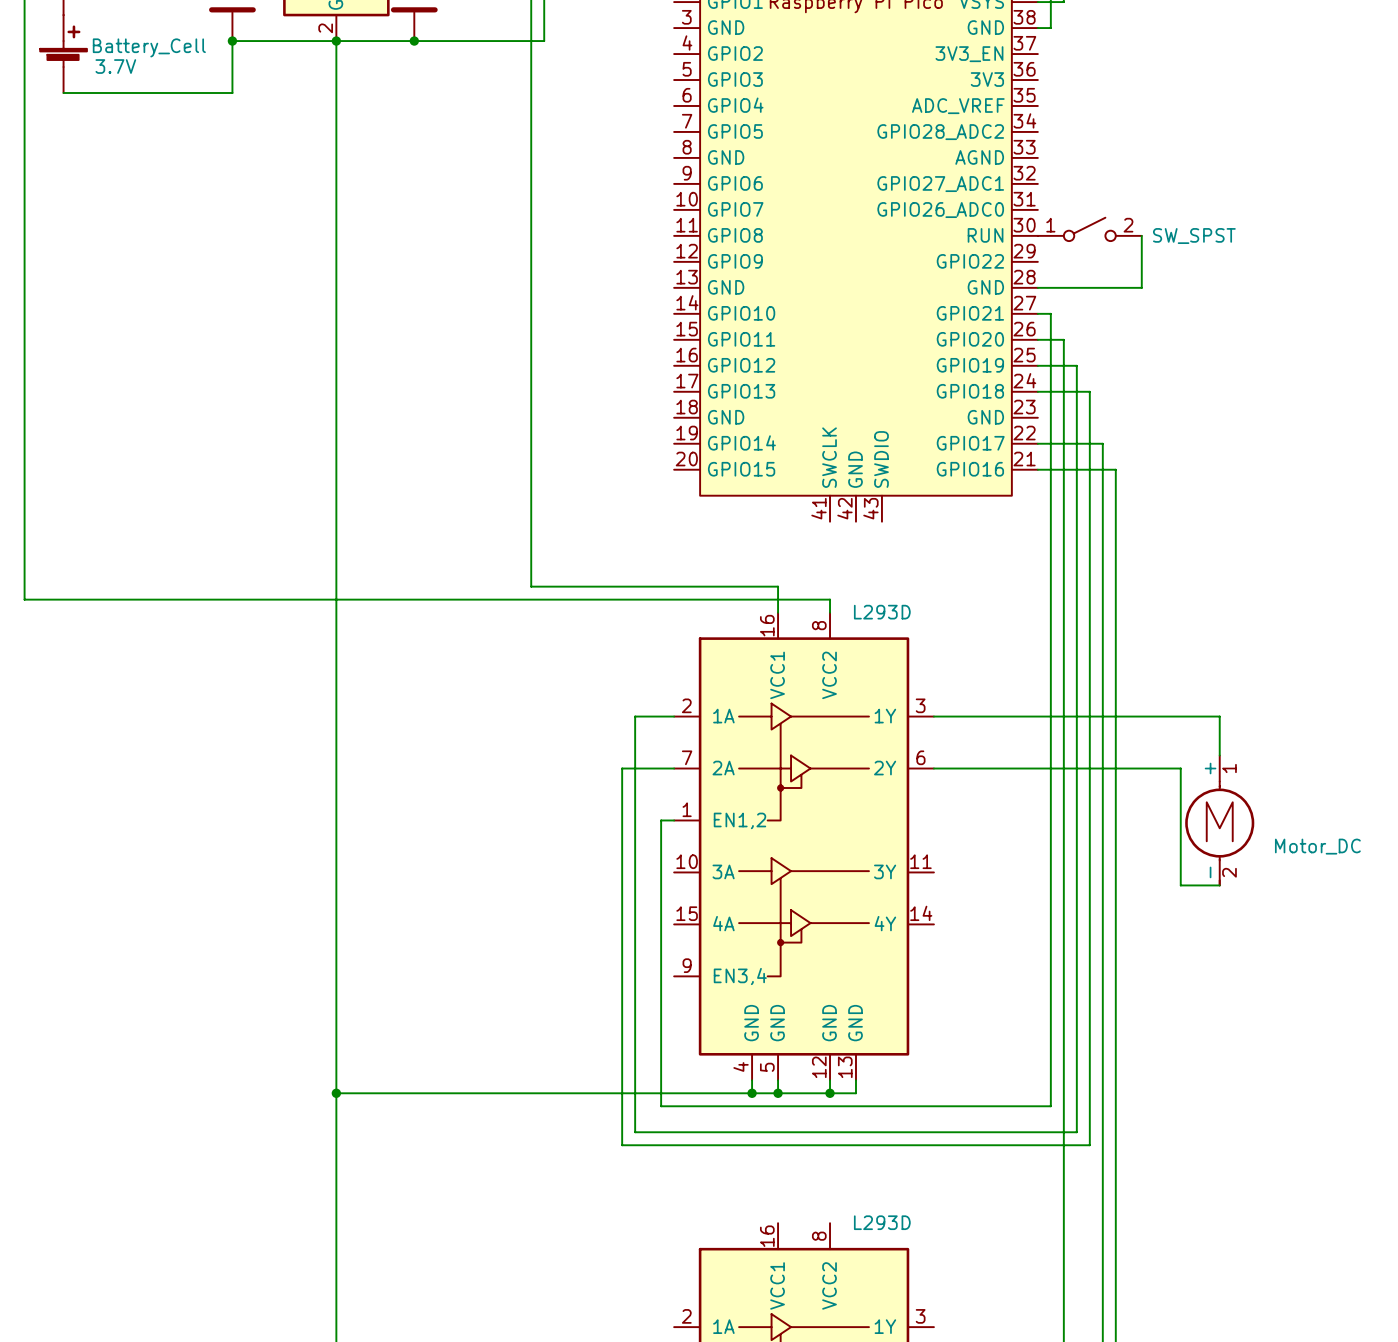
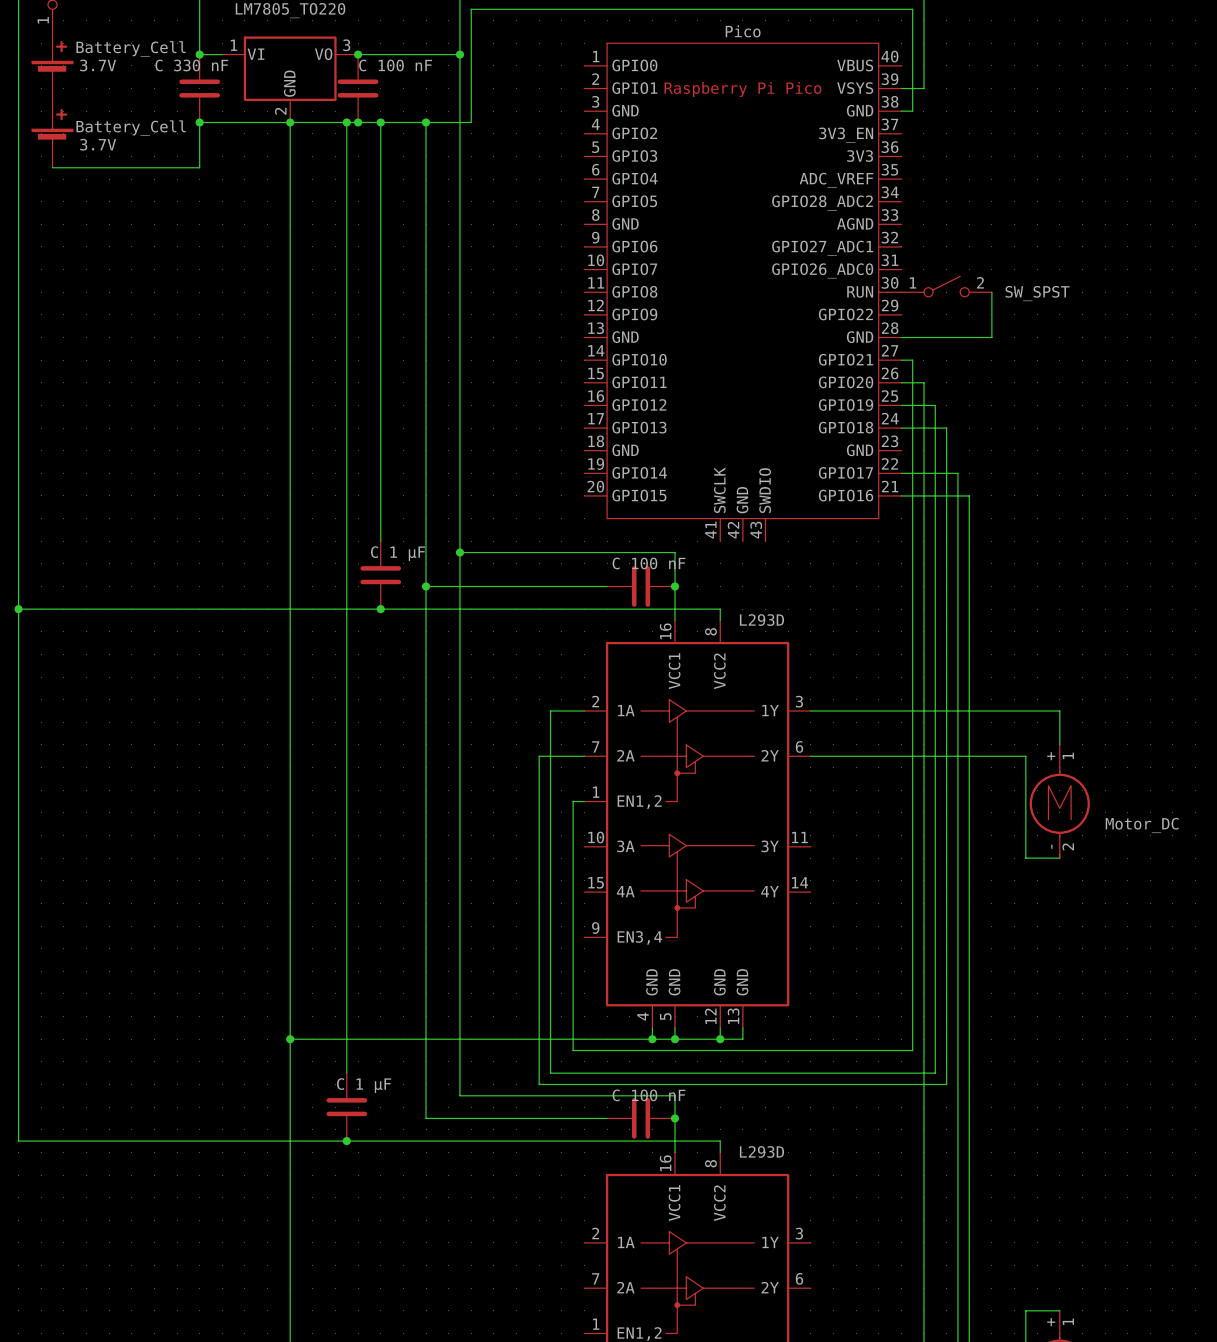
wire: none -> (346, 122) (346, 1073)
junction: none -> (346, 122)
wire: none -> (380, 122) (380, 541)
junction: none -> (380, 122)
wire: none -> (426, 122) (426, 1118) (607, 1118)
junction: none -> (426, 122)
junction: none -> (459, 552)
part: none -> C 1 µF (380, 575)
wire: none -> (426, 586) (607, 586)
junction: none -> (426, 586)
part: none -> C 100 nF (641, 586)
junction: none -> (675, 586)
wire: (531, 586) (778, 586) -> (459, 552) (675, 552) (675, 597)
wire: none -> (459, 597) (459, 1095) (675, 1095) (675, 1152)
wire: none -> (18, 609) (18, 1141) (720, 1141) (720, 1152)
junction: none -> (18, 609)
junction: none -> (380, 609)
part: none -> C 1 µF (346, 1107)
part: none -> C 100 nF (641, 1118)
junction: none -> (675, 1118)
junction: none -> (346, 1141)

